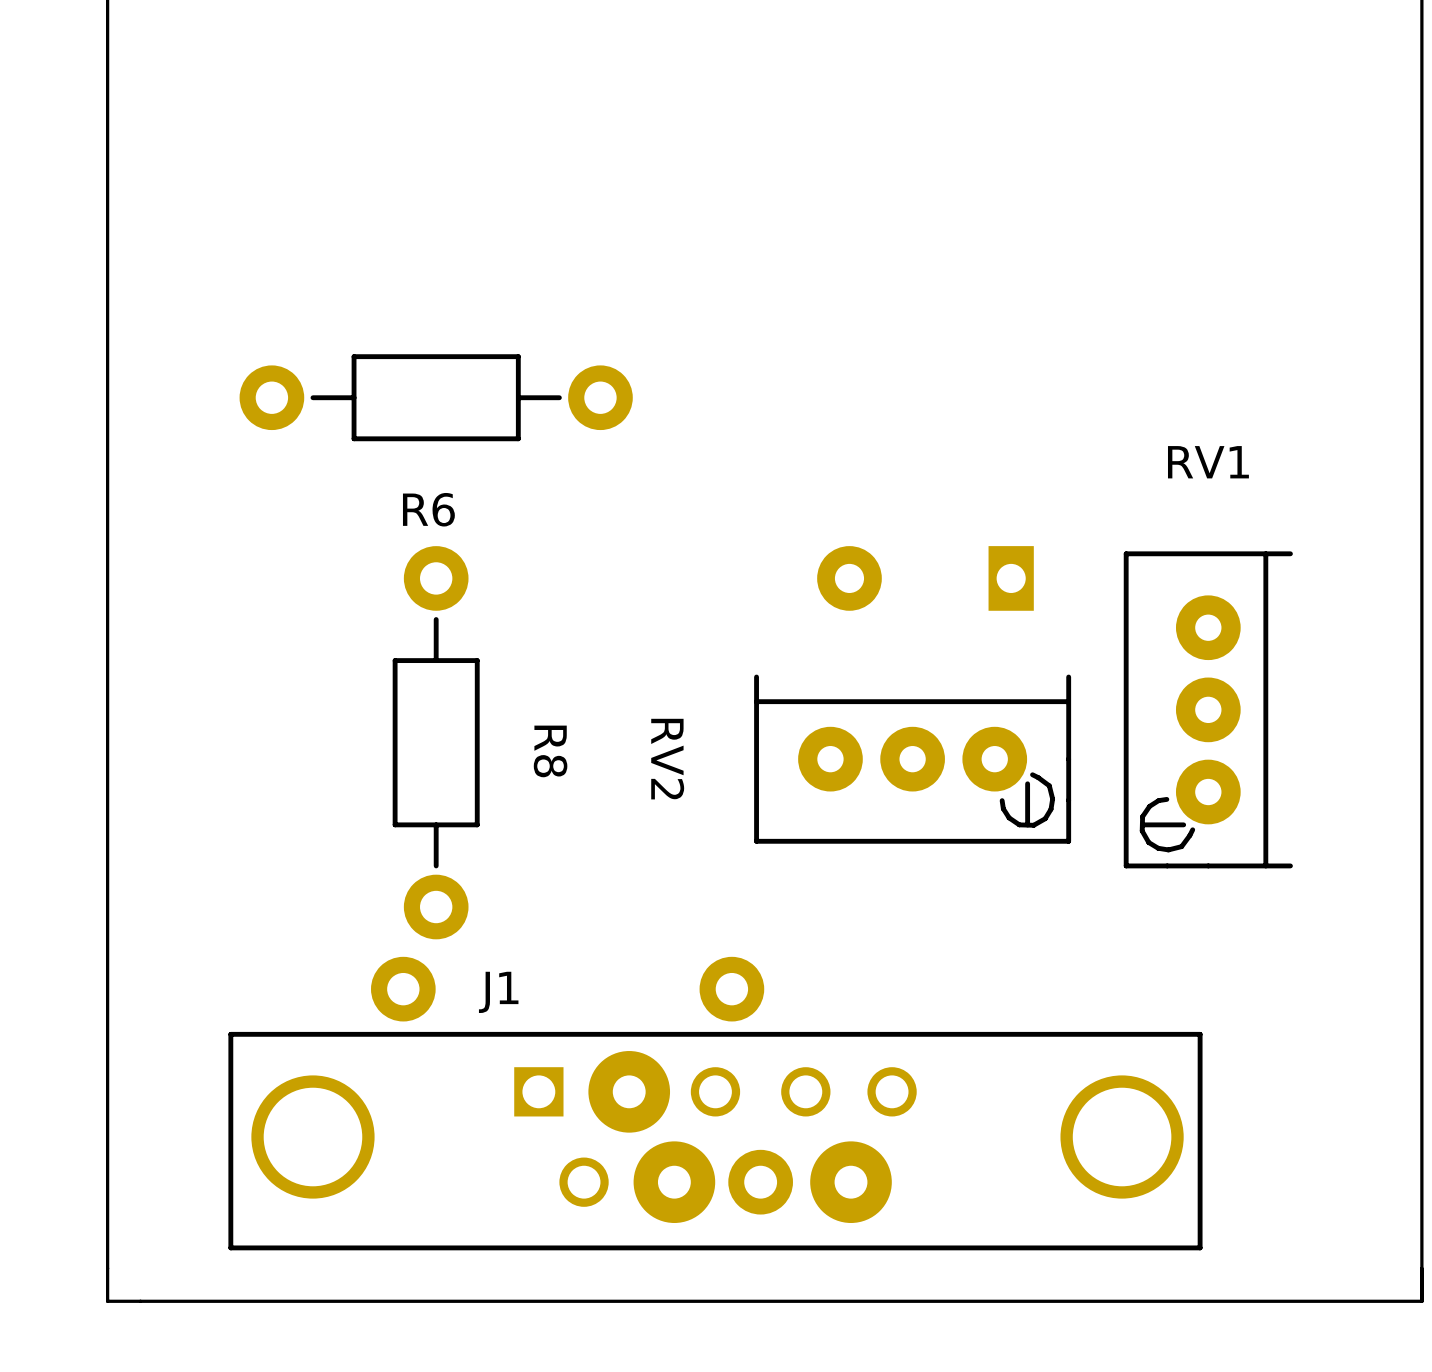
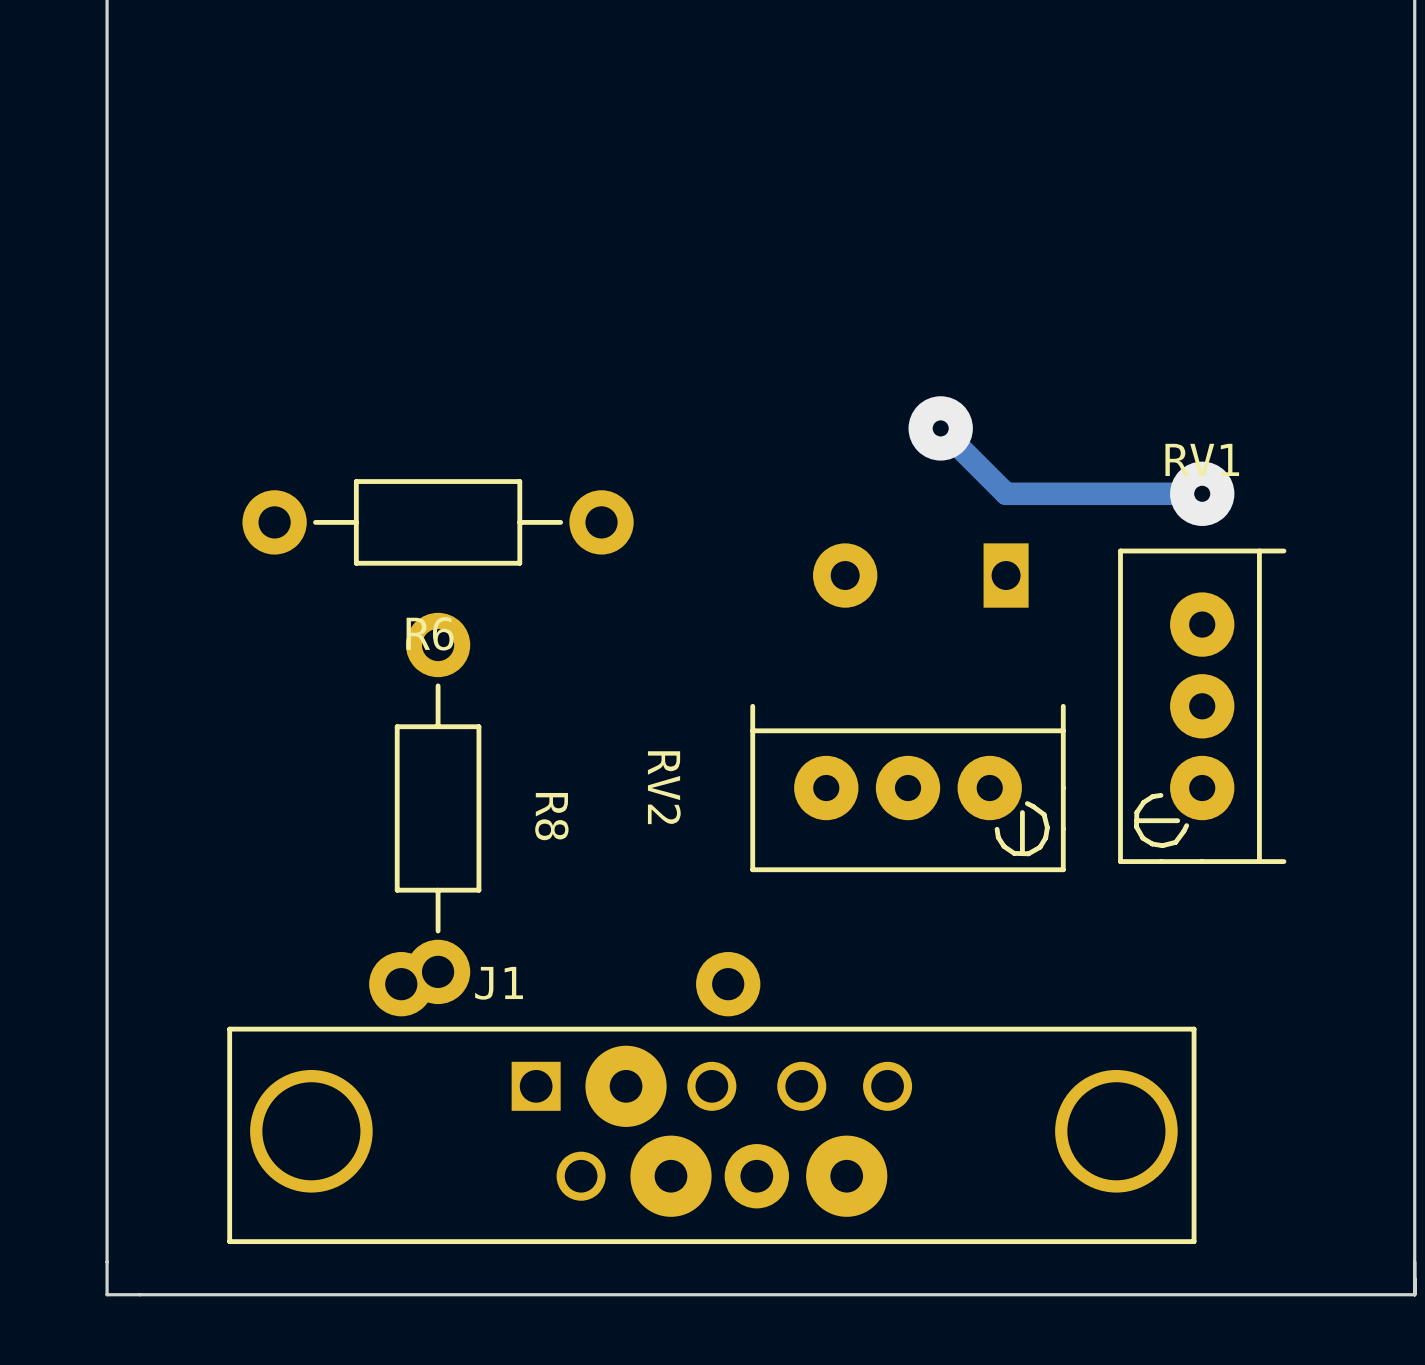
R6 position: (436, 397) -> (438, 522)
track: none -> (940, 428) (1006, 493) (1202, 493)
via: none -> (940, 428)
via: none -> (1202, 493)
R8 position: (436, 742) -> (438, 808)
RV2 position: (912, 759) -> (908, 788)

